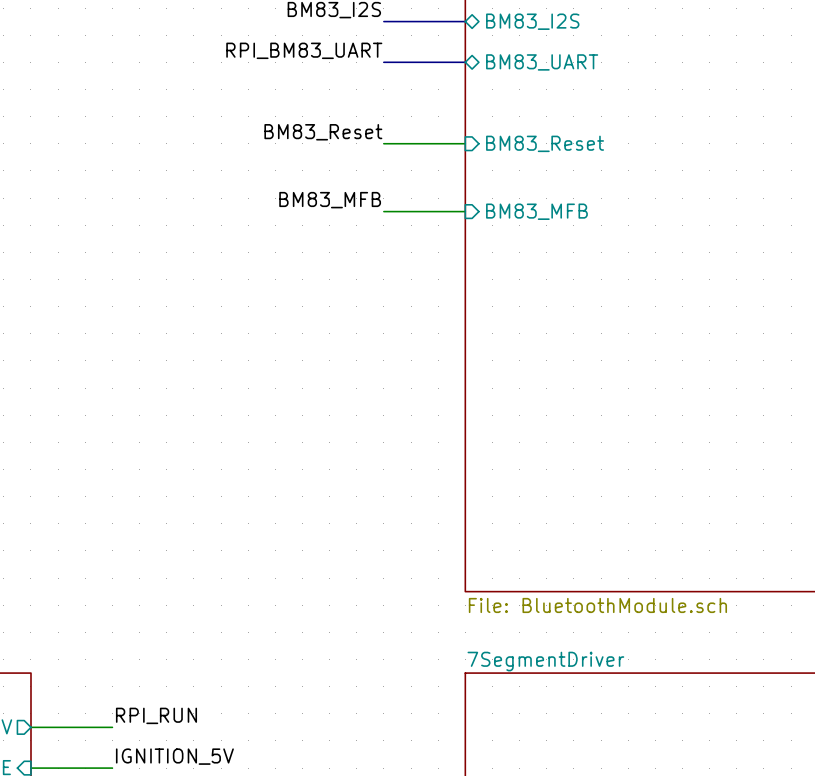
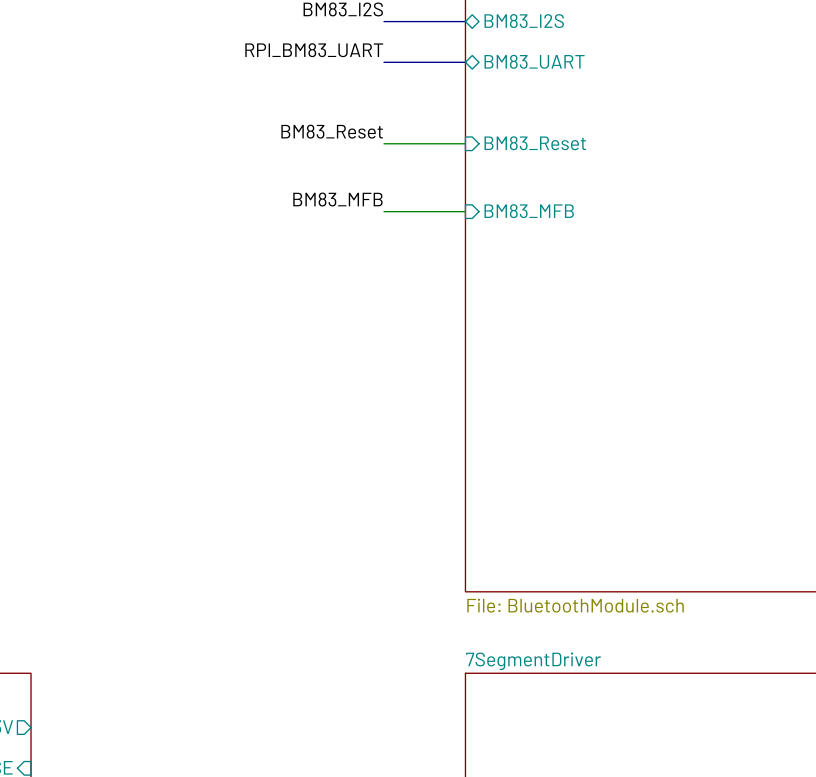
label: RPI_RUN (156, 715) -> none
wire: (30, 727) (112, 727) -> none
label: IGNITION_5V (174, 756) -> none
wire: (30, 768) (112, 768) -> none

